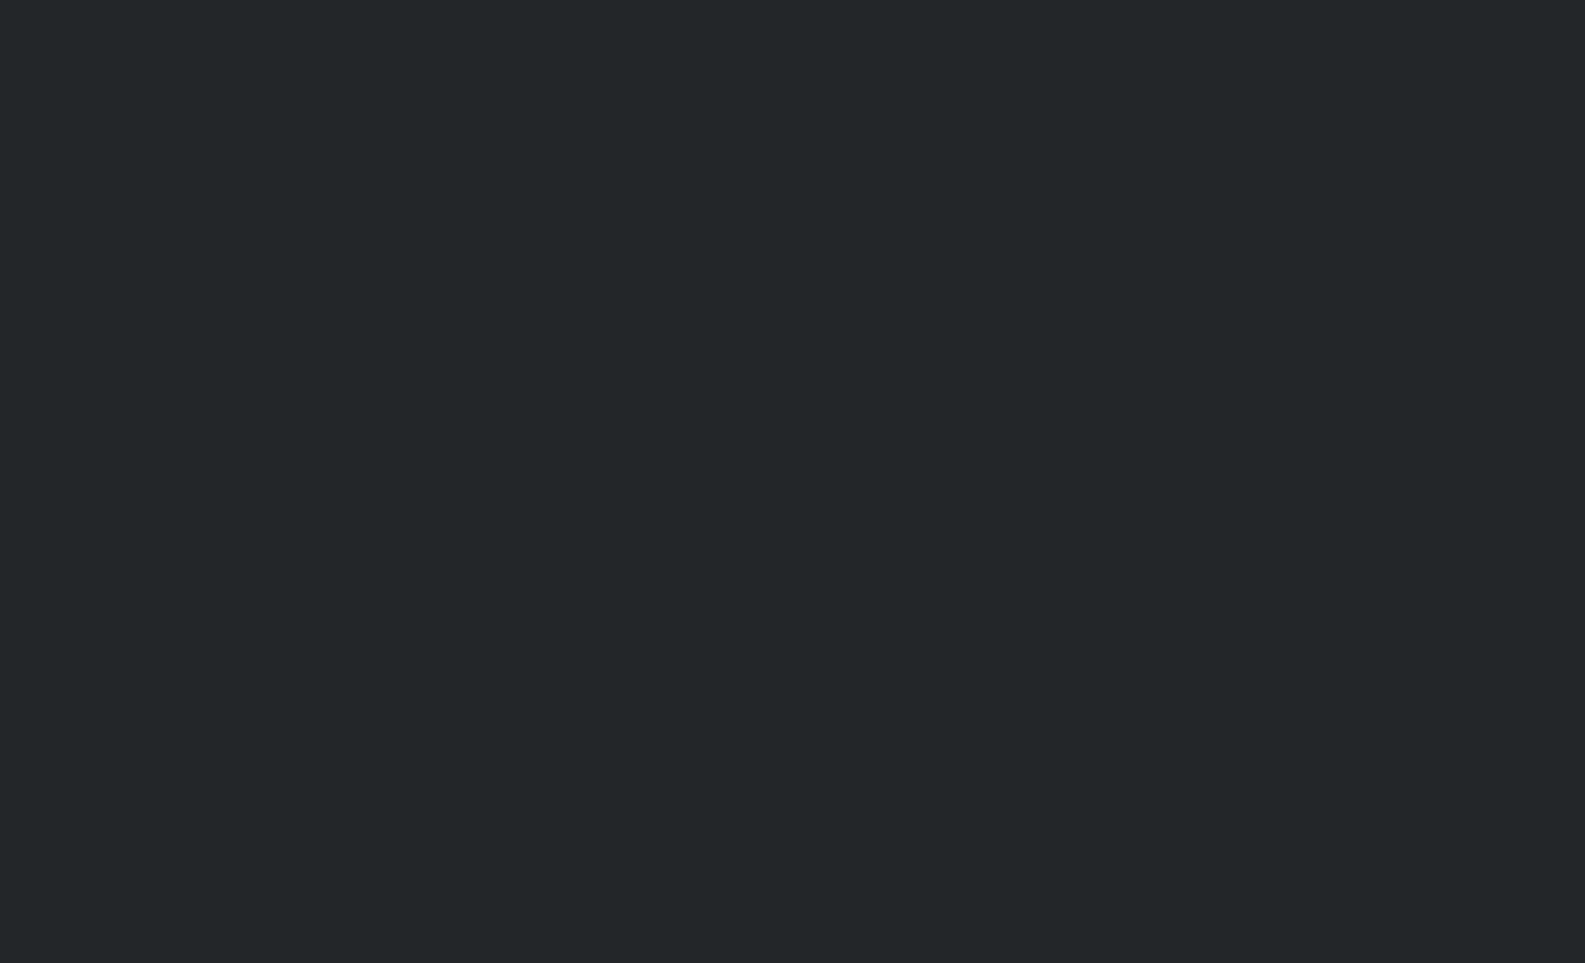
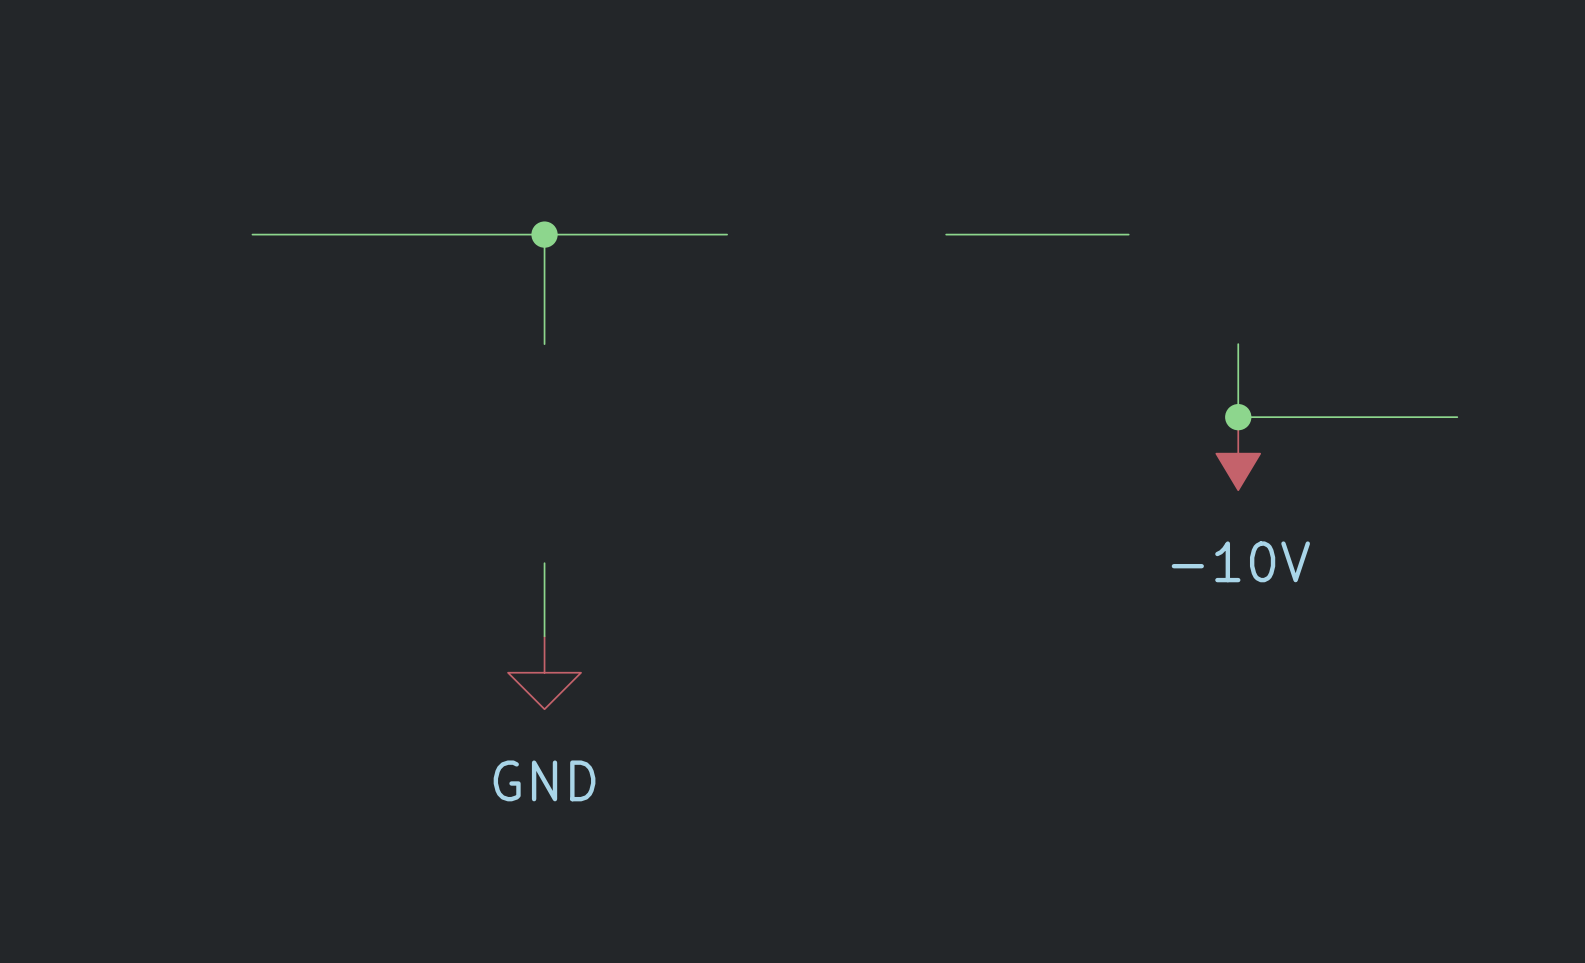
wire: none -> (252, 234) (727, 234)
wire: none -> (544, 234) (544, 344)
junction: none -> (544, 234)
wire: none -> (946, 234) (1128, 234)
wire: none -> (1238, 344) (1238, 417) (1457, 417)
junction: none -> (1238, 417)
power symbol: none -> -10V (1238, 453)
wire: none -> (544, 563) (544, 636)
power symbol: none -> GND (544, 672)

